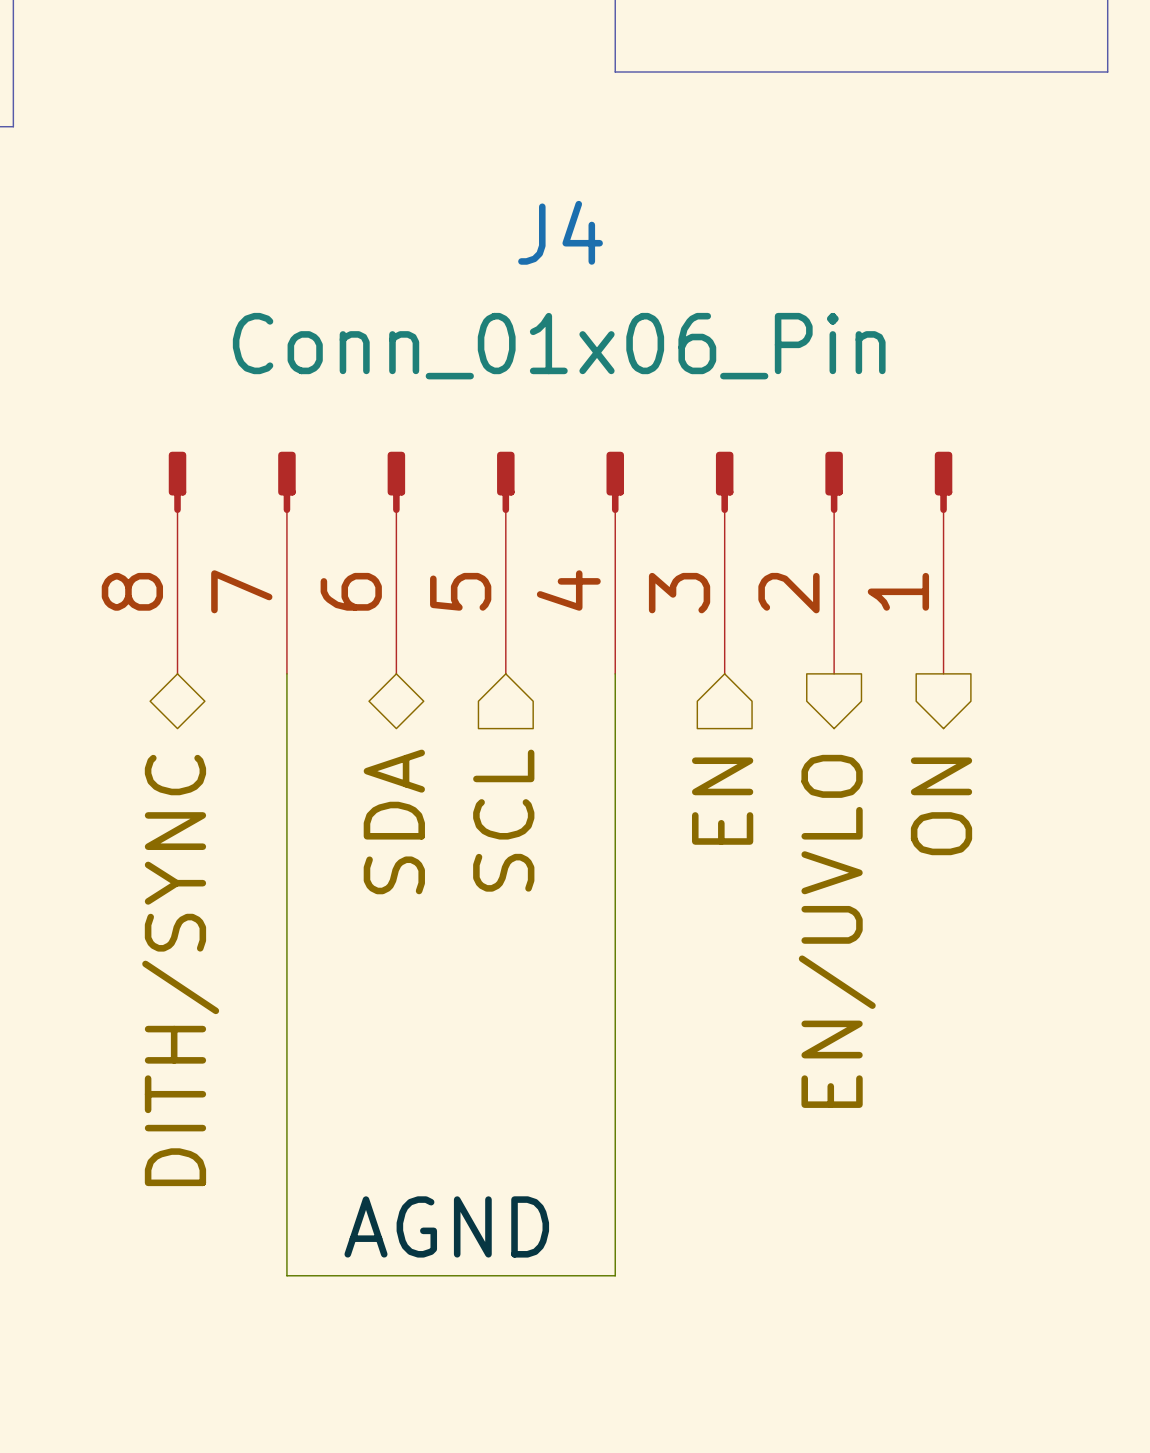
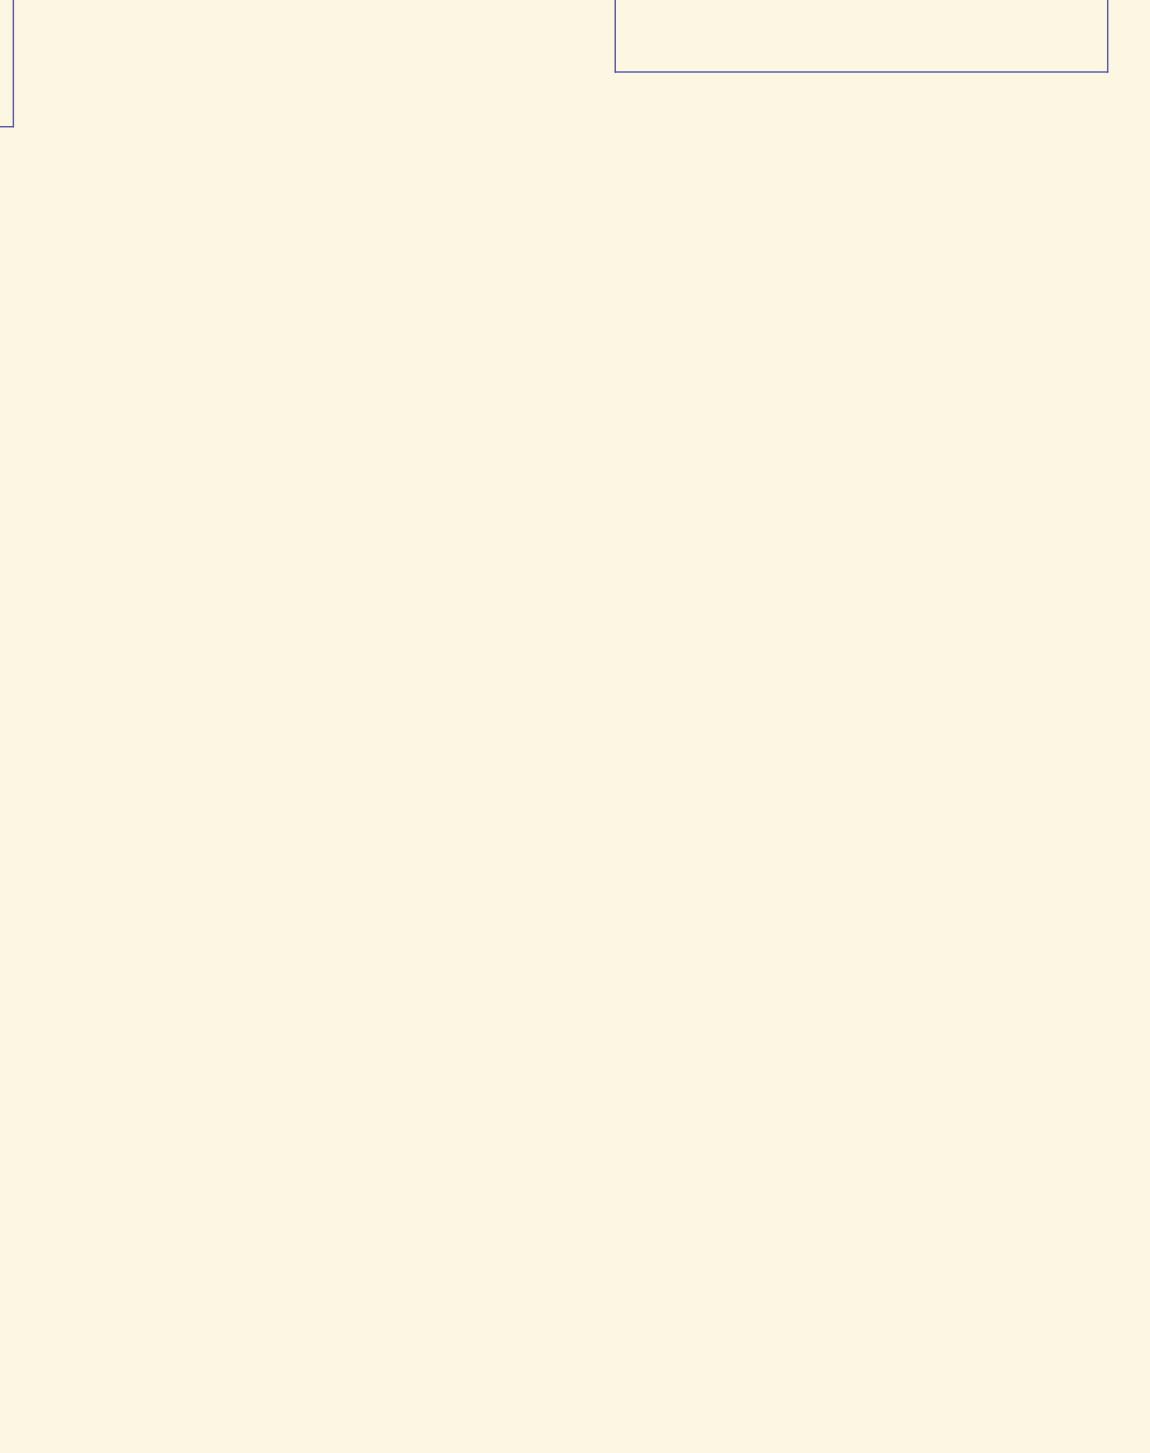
J4: Conn_01x06_Pin (560, 562) -> none
wire: (286, 673) (286, 1275) (615, 1275) (615, 673) -> none
hierarchical label: EN (722, 801) -> none
hierarchical label: ON (941, 806) -> none
hierarchical label: SCL (503, 820) -> none
hierarchical label: SDA (394, 821) -> none
hierarchical label: EN/UVLO (837, 931) -> none
hierarchical label: DITH/SYNC (180, 970) -> none
label: AGND (446, 1226) -> none

